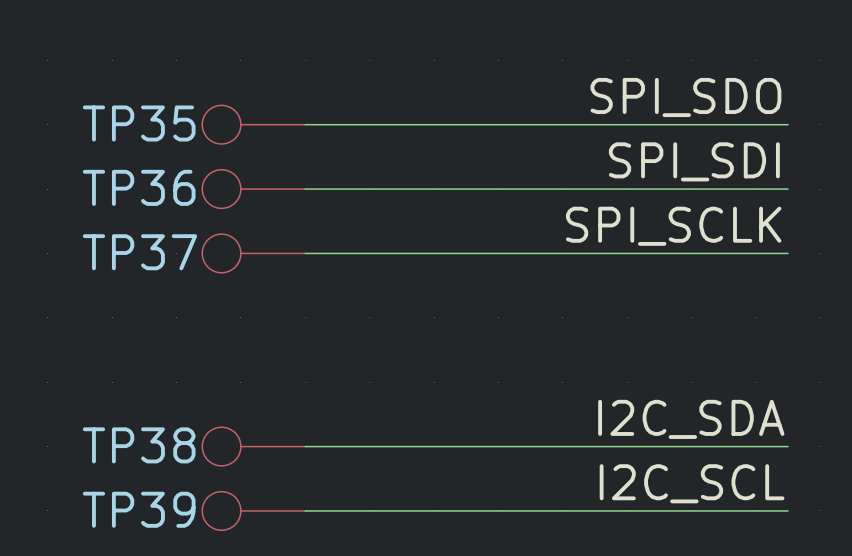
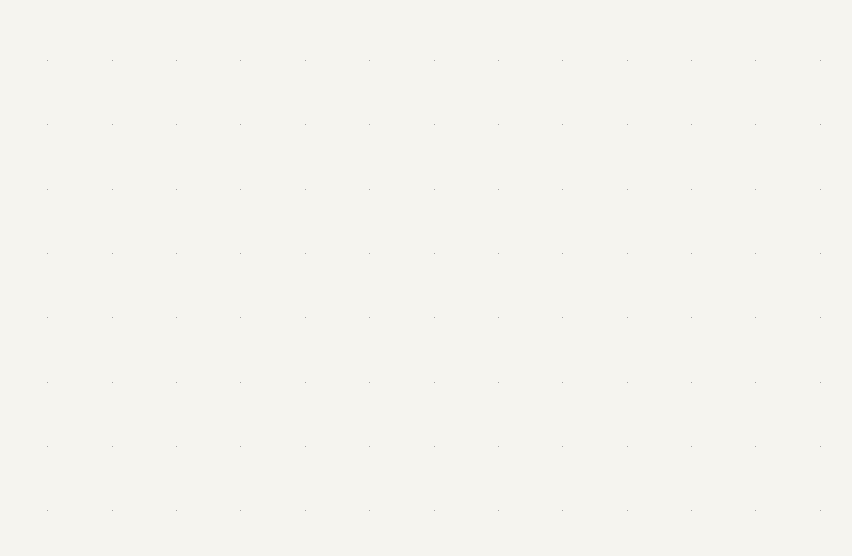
label: SPI_SDO (685, 97) -> none
TP35: (253, 124) -> none
wire: (305, 124) (788, 124) -> none
label: SPI_SDI (694, 161) -> none
TP36: (253, 189) -> none
wire: (305, 189) (788, 189) -> none
label: SPI_SCLK (673, 226) -> none
TP37: (253, 253) -> none
wire: (305, 253) (788, 253) -> none
label: I2C_SDA (691, 419) -> none
TP38: (253, 446) -> none
wire: (305, 446) (788, 446) -> none
label: I2C_SCL (692, 483) -> none
TP39: (253, 510) -> none
wire: (305, 510) (788, 510) -> none

